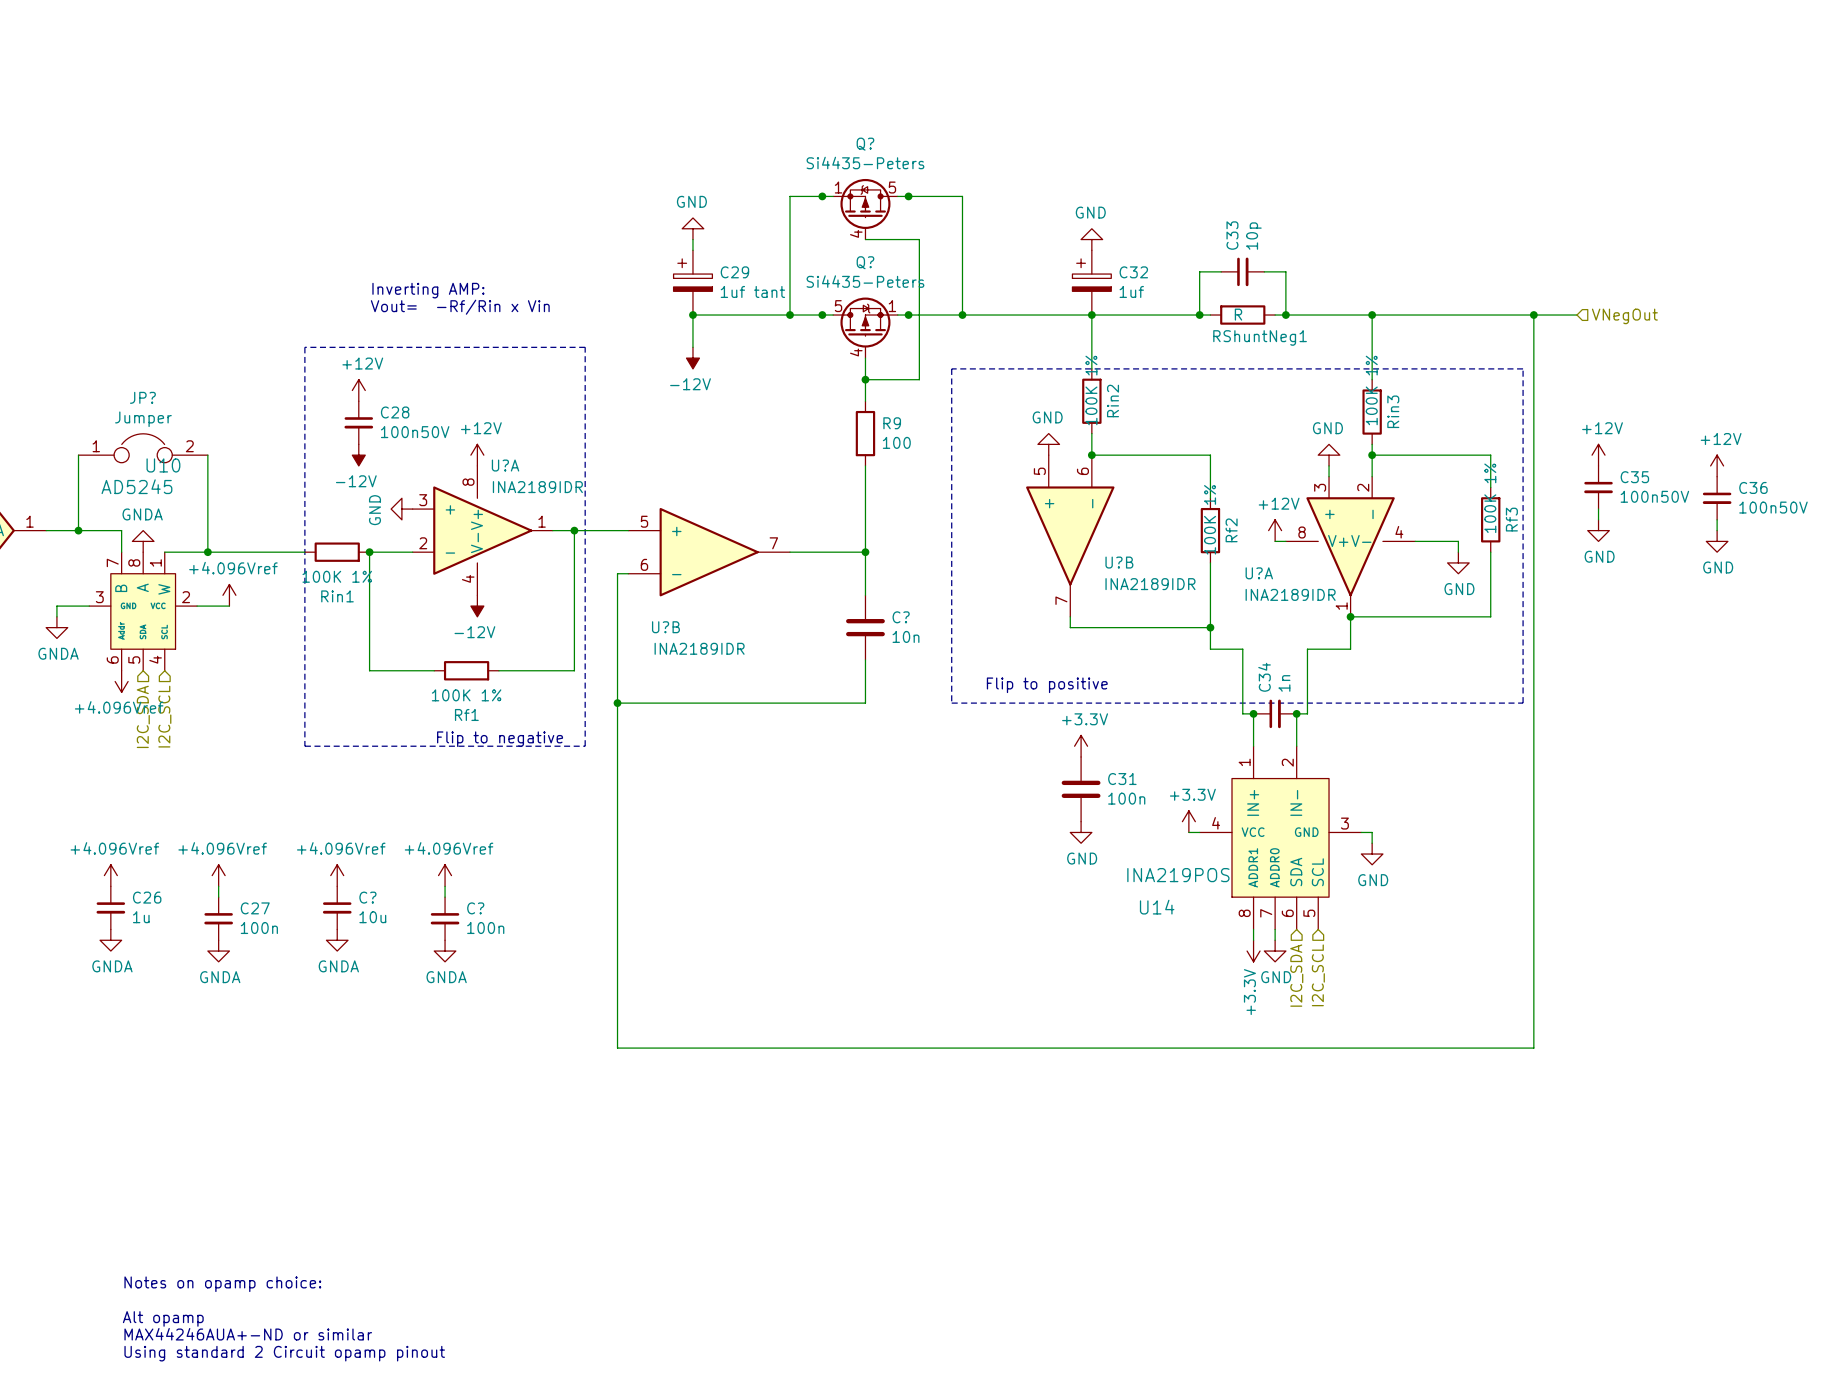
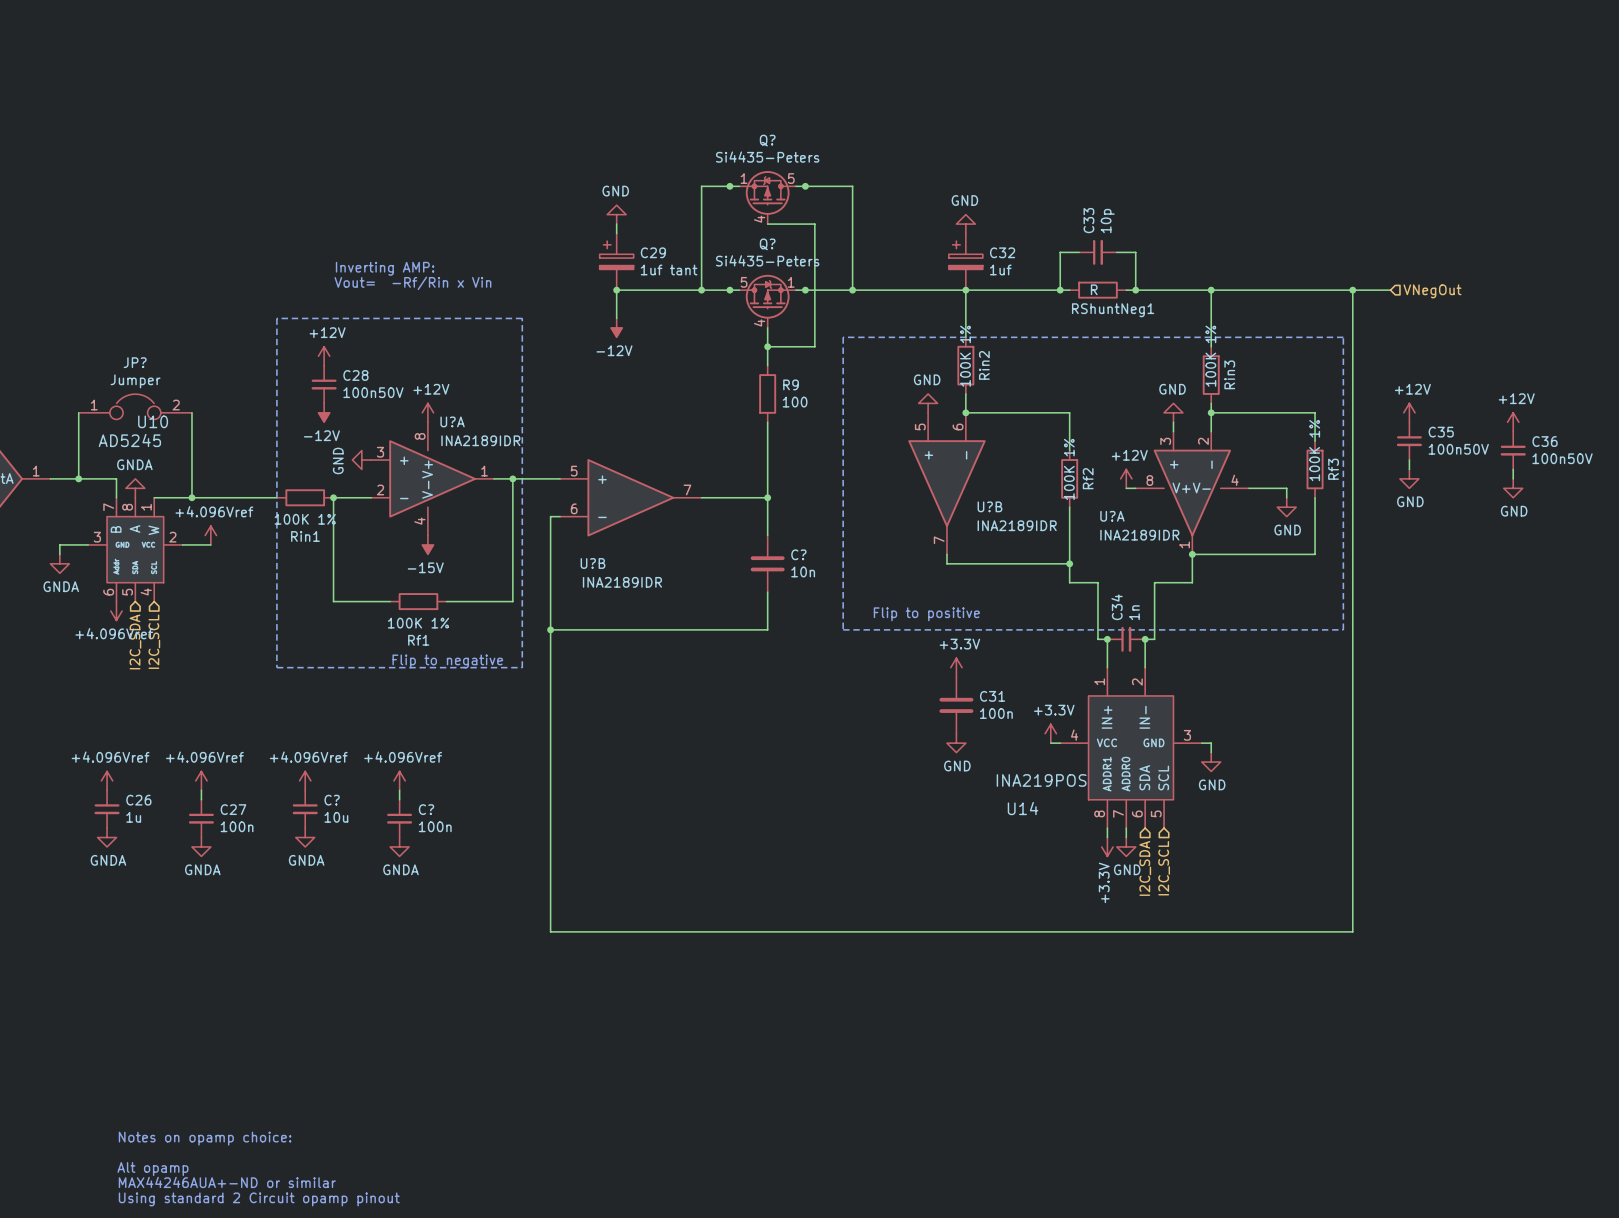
power symbol: -12V (477, 606) -> -15V (427, 544)

